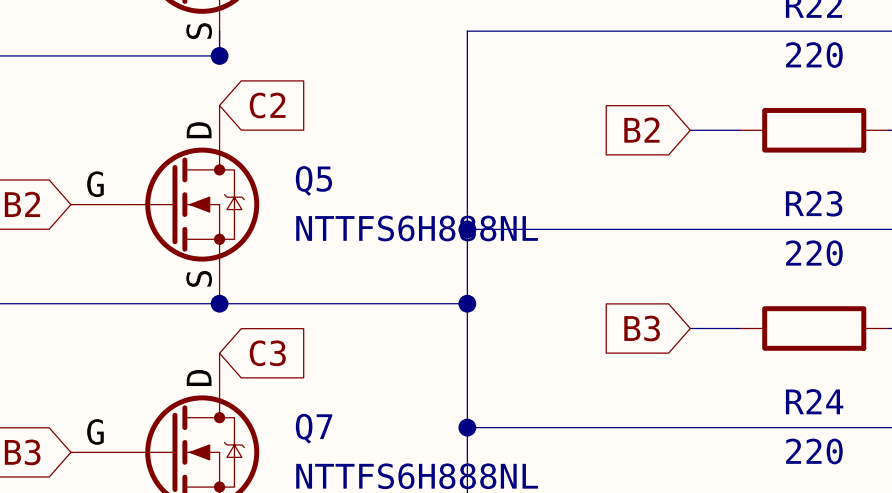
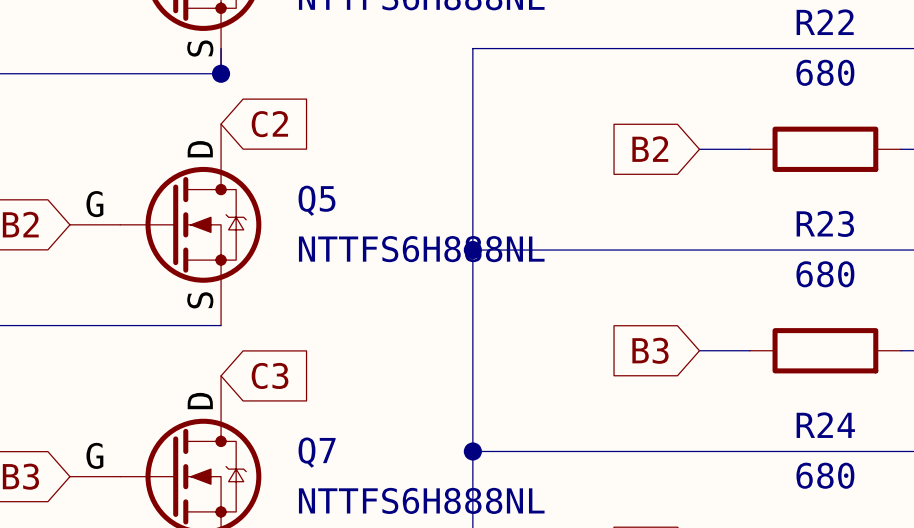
R22 value: 220 (814, 55) -> 680 (825, 72)
R23 value: 220 (814, 253) -> 680 (825, 274)
wire: (219, 303) (467, 303) -> none
junction: (219, 303) -> none
junction: (467, 303) -> none
R24 value: 220 (814, 451) -> 680 (825, 475)

